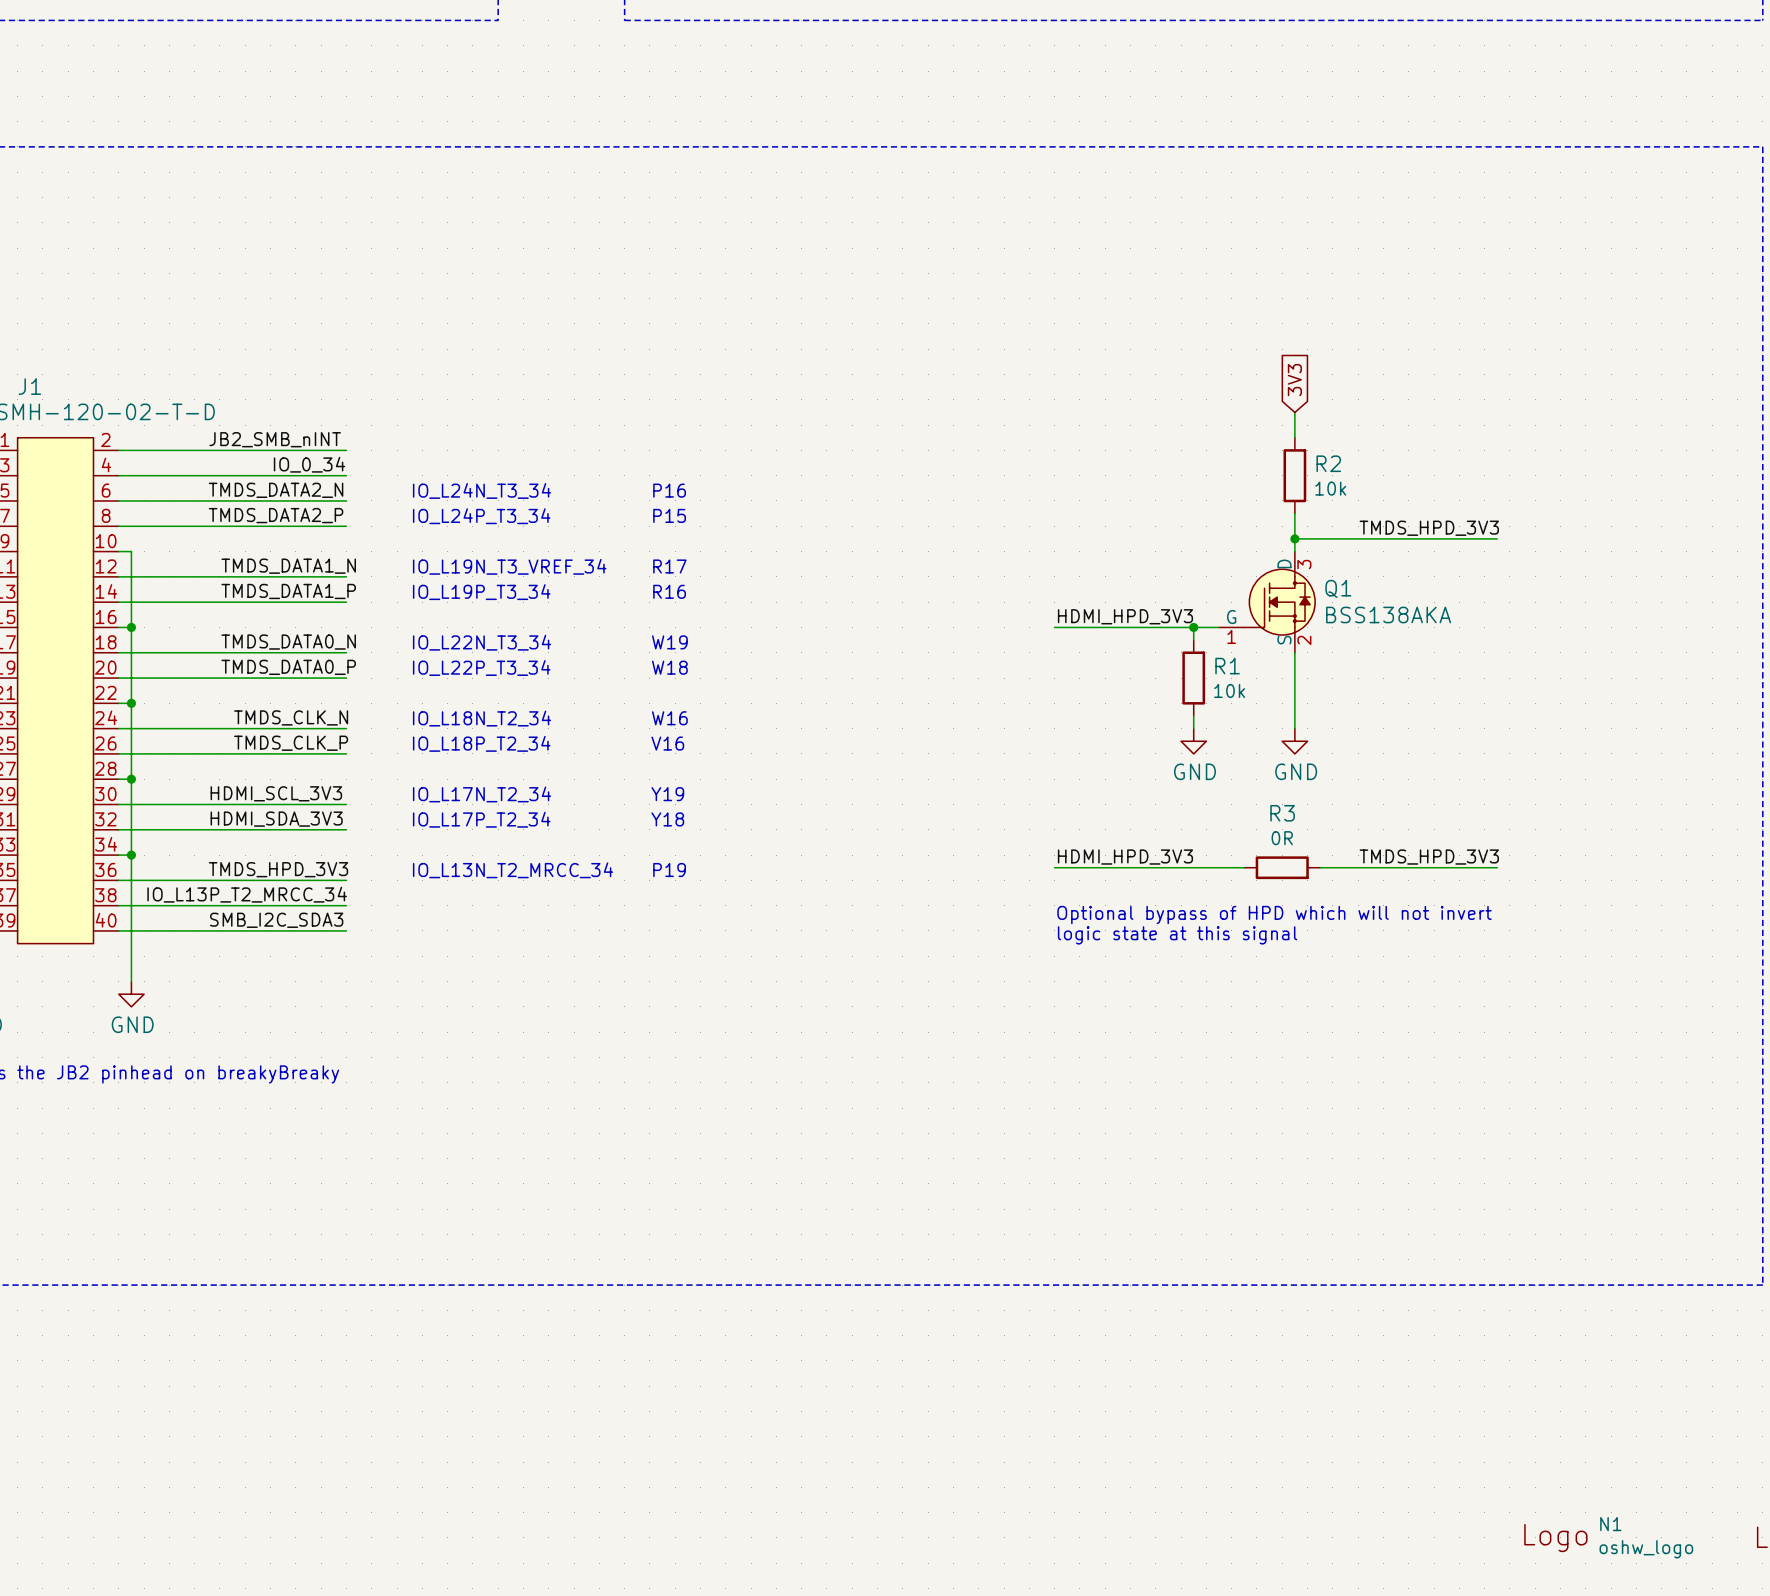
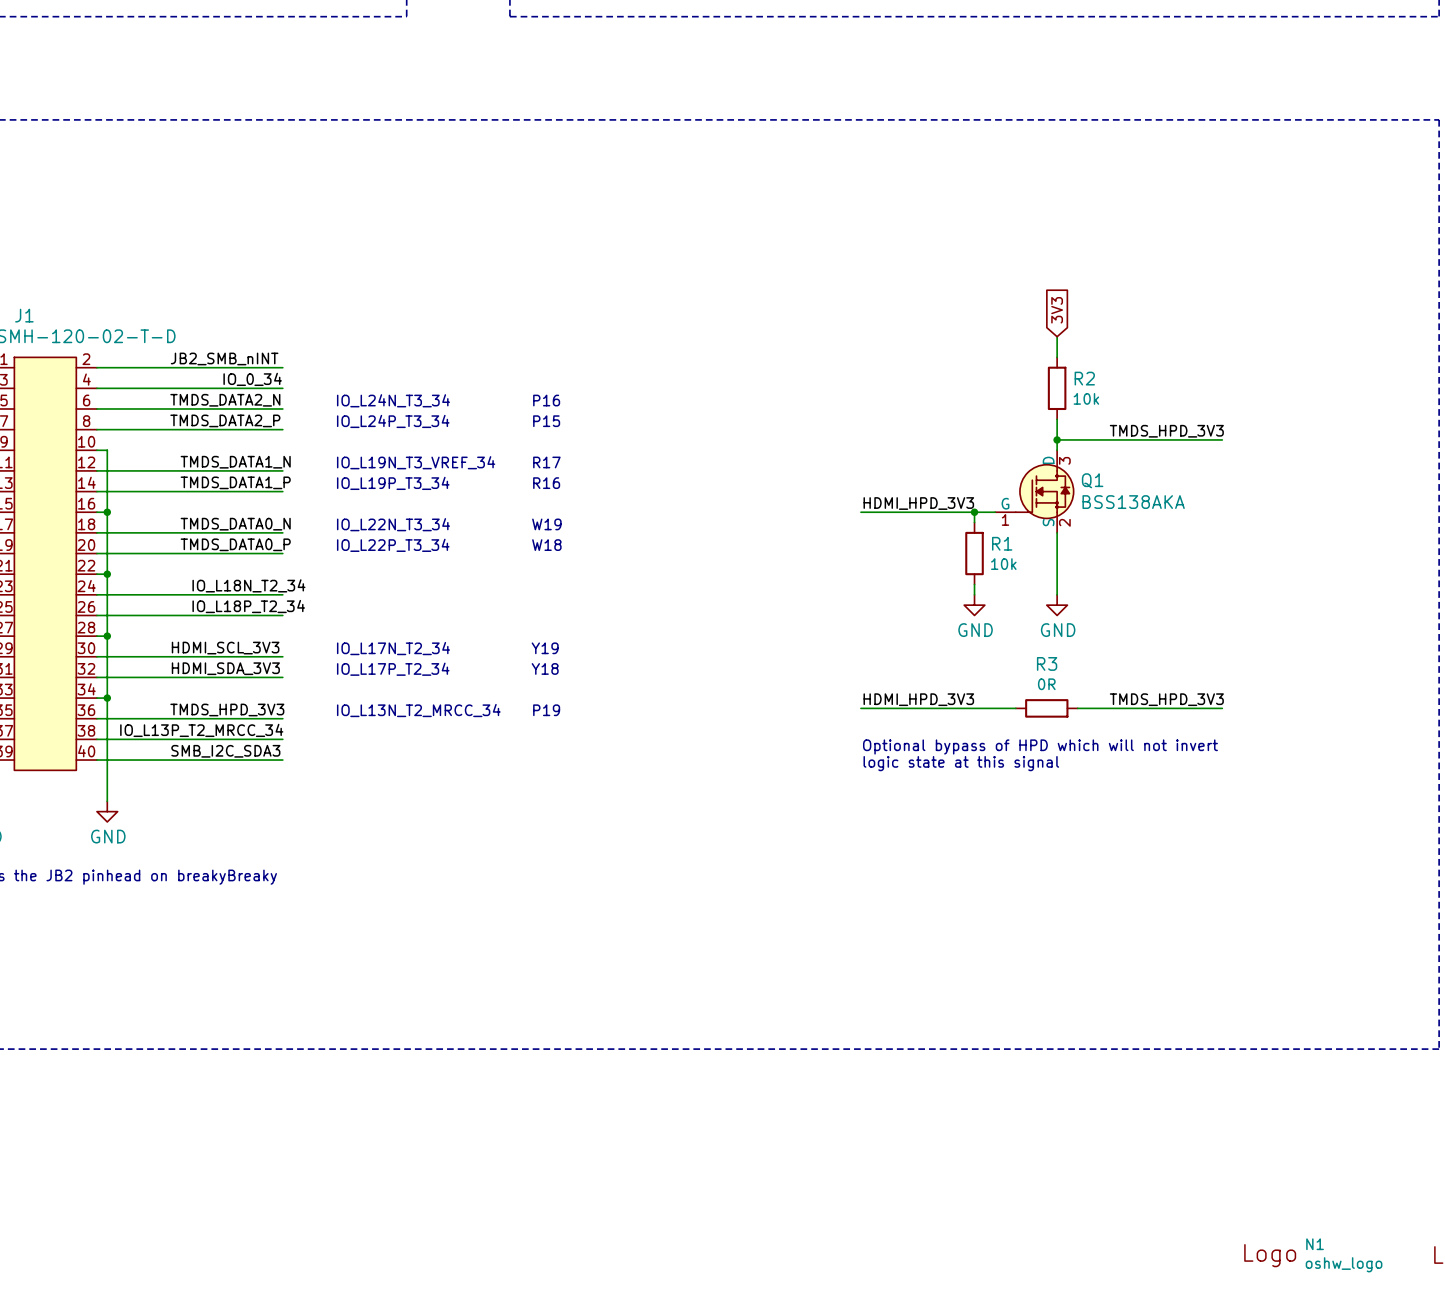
label: TMDS_CLK_N (291, 717) -> IO_L18N_T2_34 (248, 585)
text: IO_L18N_T2_34 (482, 718) -> none
text: W16 (669, 718) -> none
label: TMDS_CLK_P (291, 743) -> IO_L18P_T2_34 (248, 606)
text: IO_L18P_T2_34 (481, 743) -> none
text: V16 (667, 743) -> none

